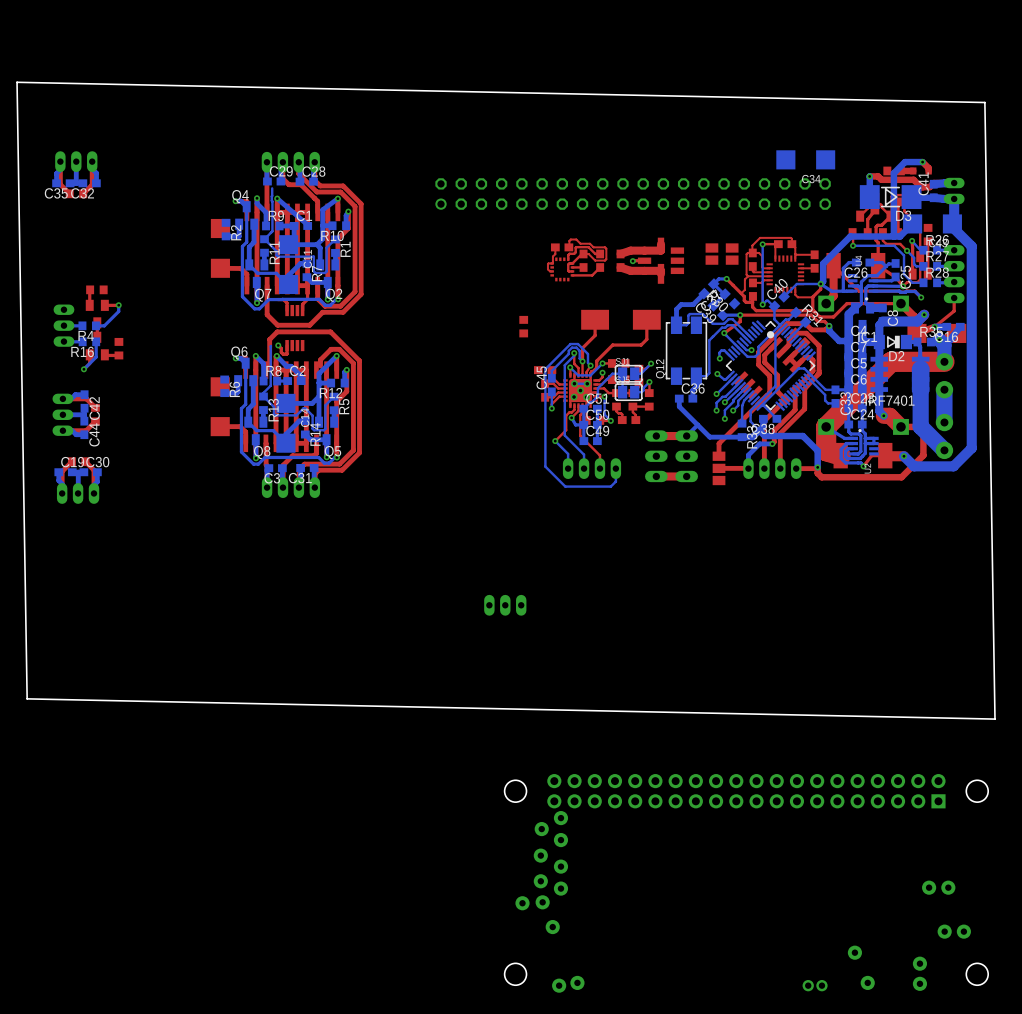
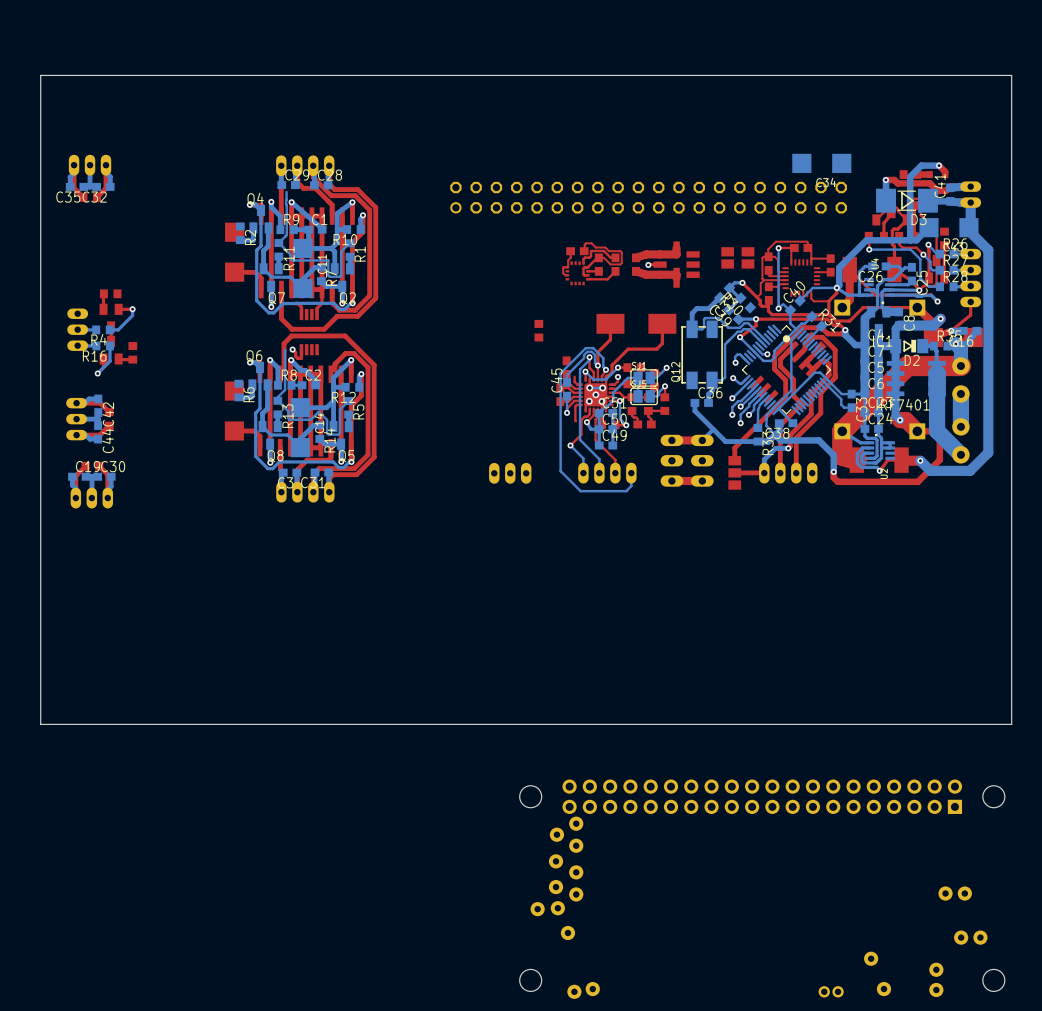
board edge: (17, 82) (27, 698) (995, 719) (984, 102) (17, 82) -> (1011, 75) (1011, 724) (40, 724) (40, 75) (1011, 75)
part rotation: 0° (545, 370) -> 90° clockwise (566, 367)
top track: none -> (574, 376) (574, 381) (580, 384)
top track: none -> (580, 404) (575, 406) (575, 421)
top track: (816, 468) (796, 468) -> none
part position: (505, 605) -> (510, 473)

